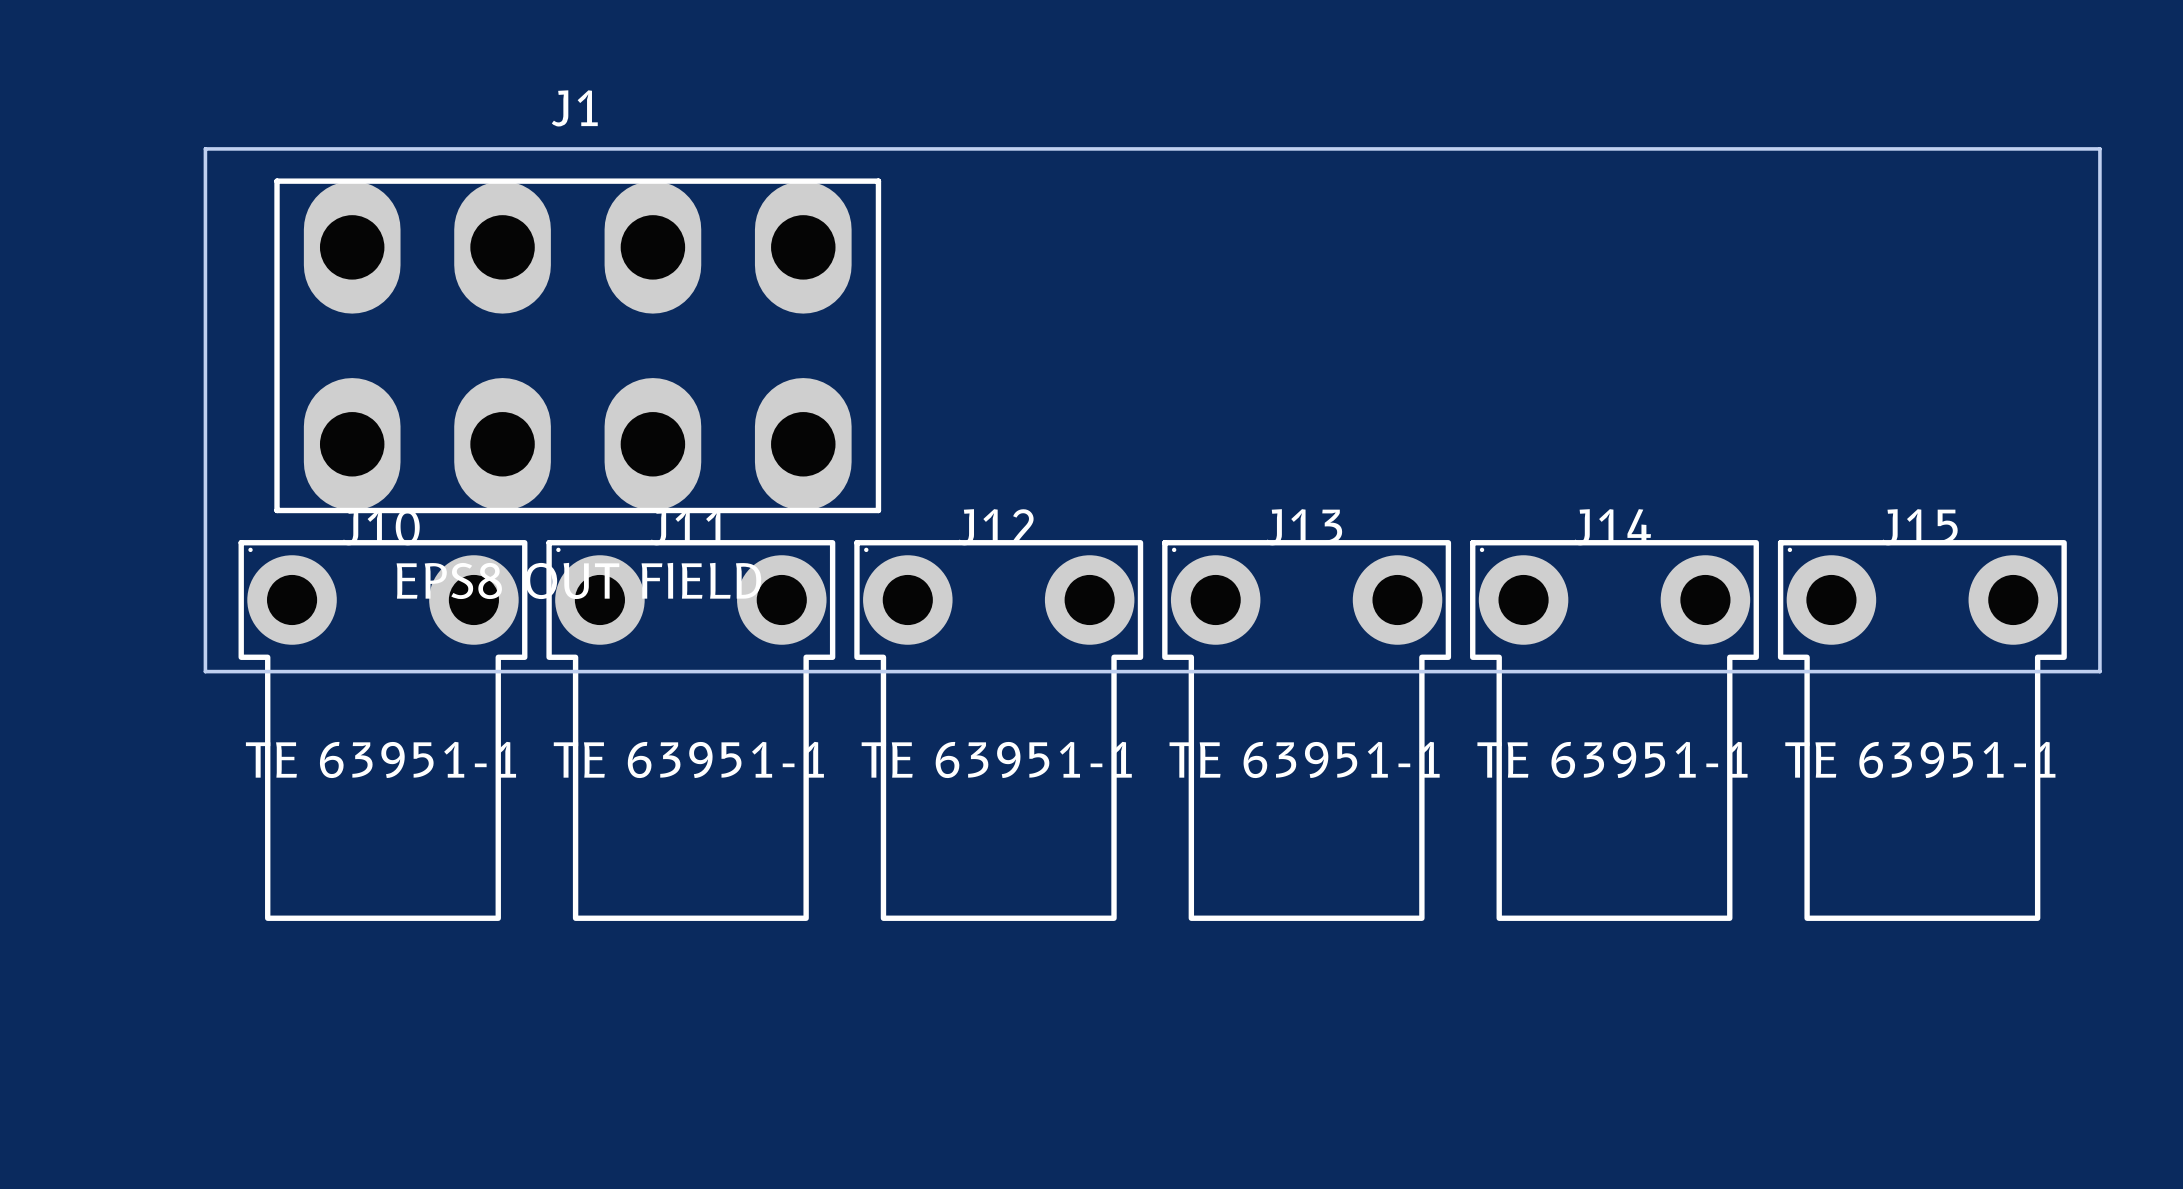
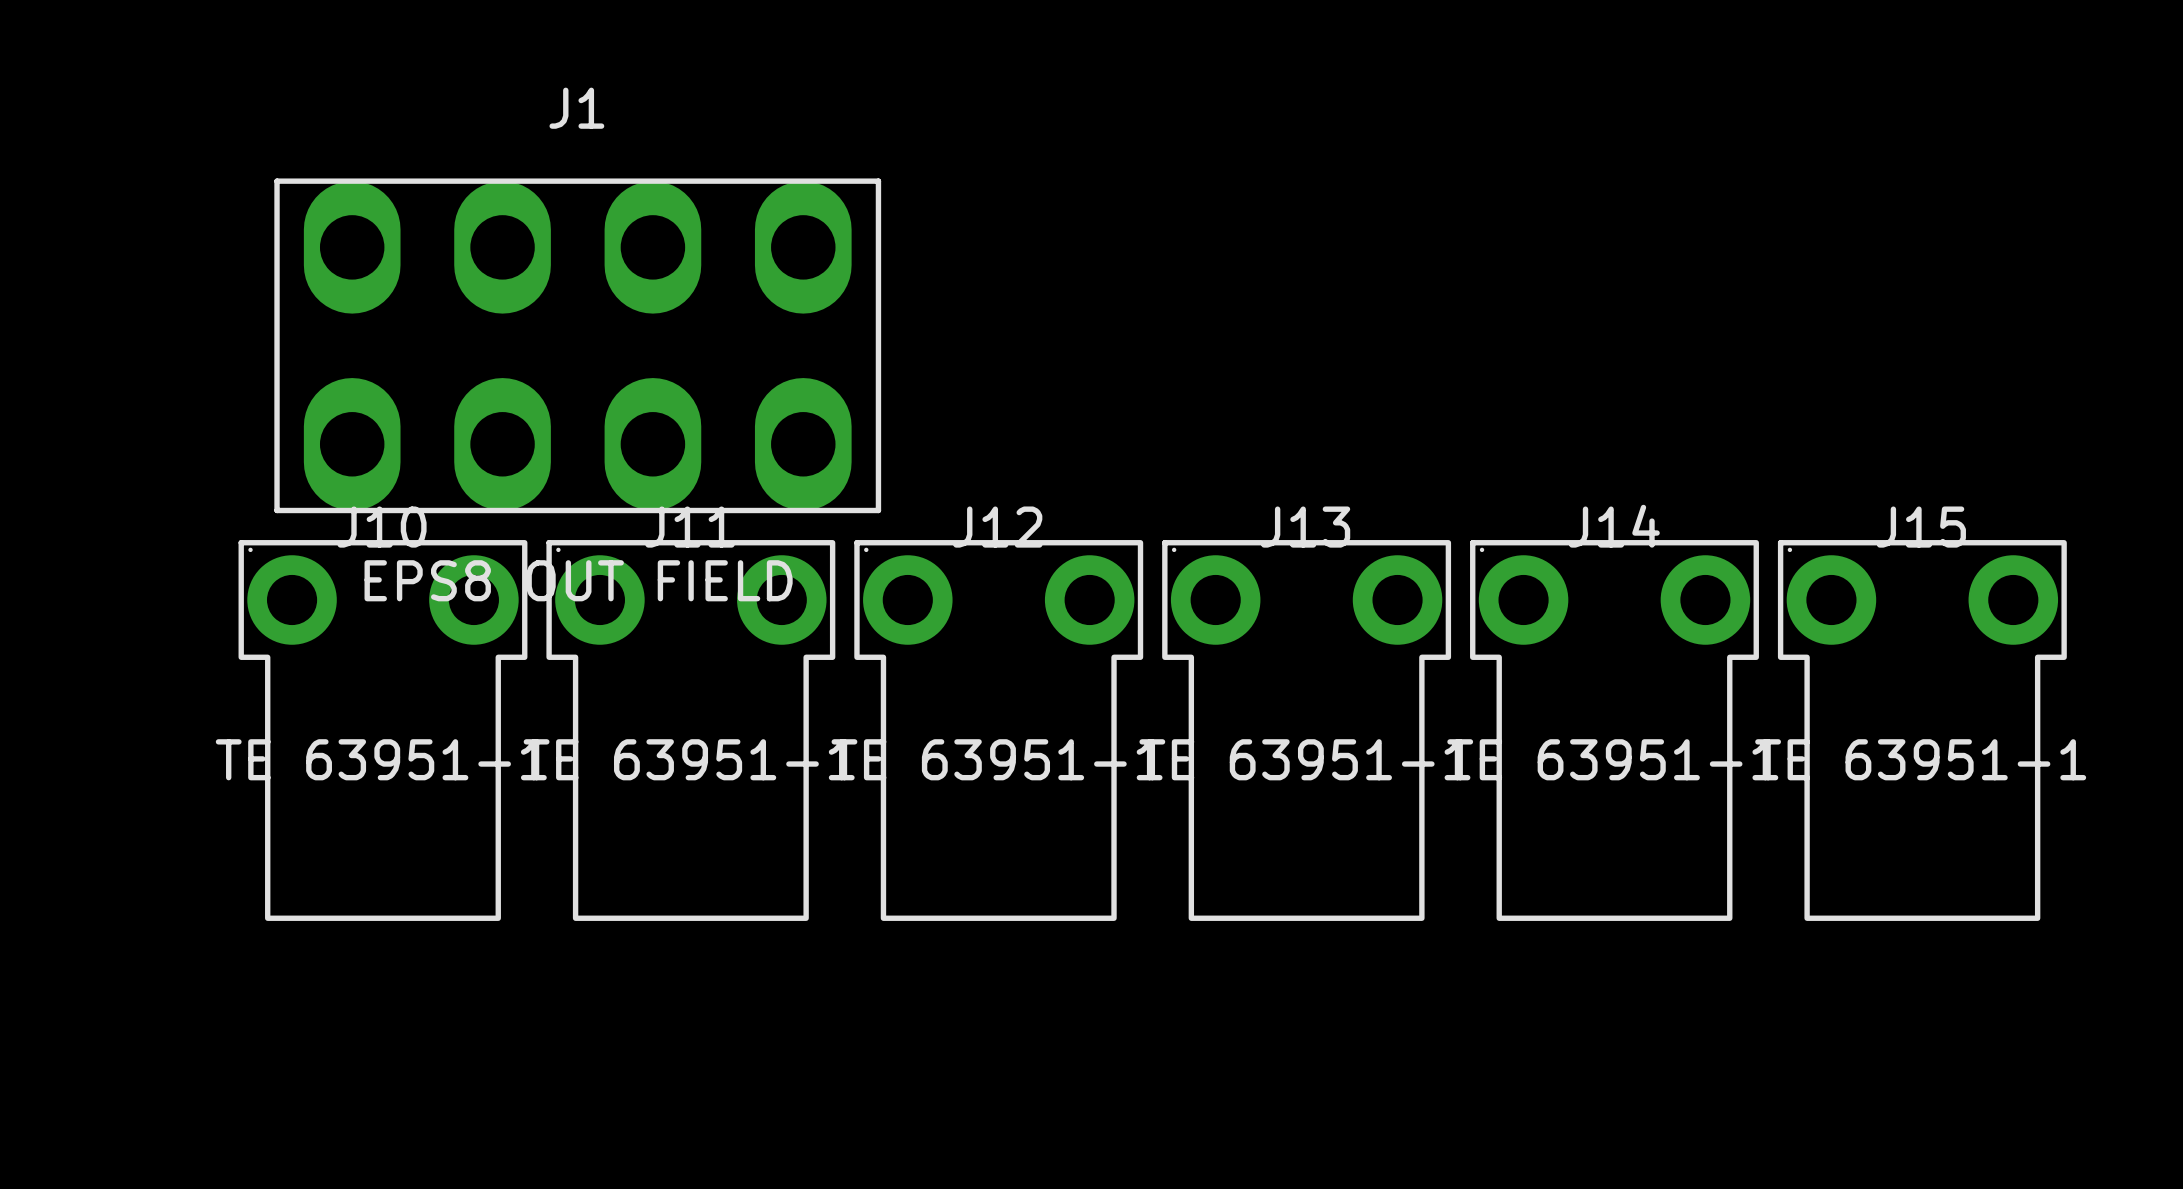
board edge: (205, 148) (2099, 148) (2099, 671) (205, 671) (205, 148) -> none

